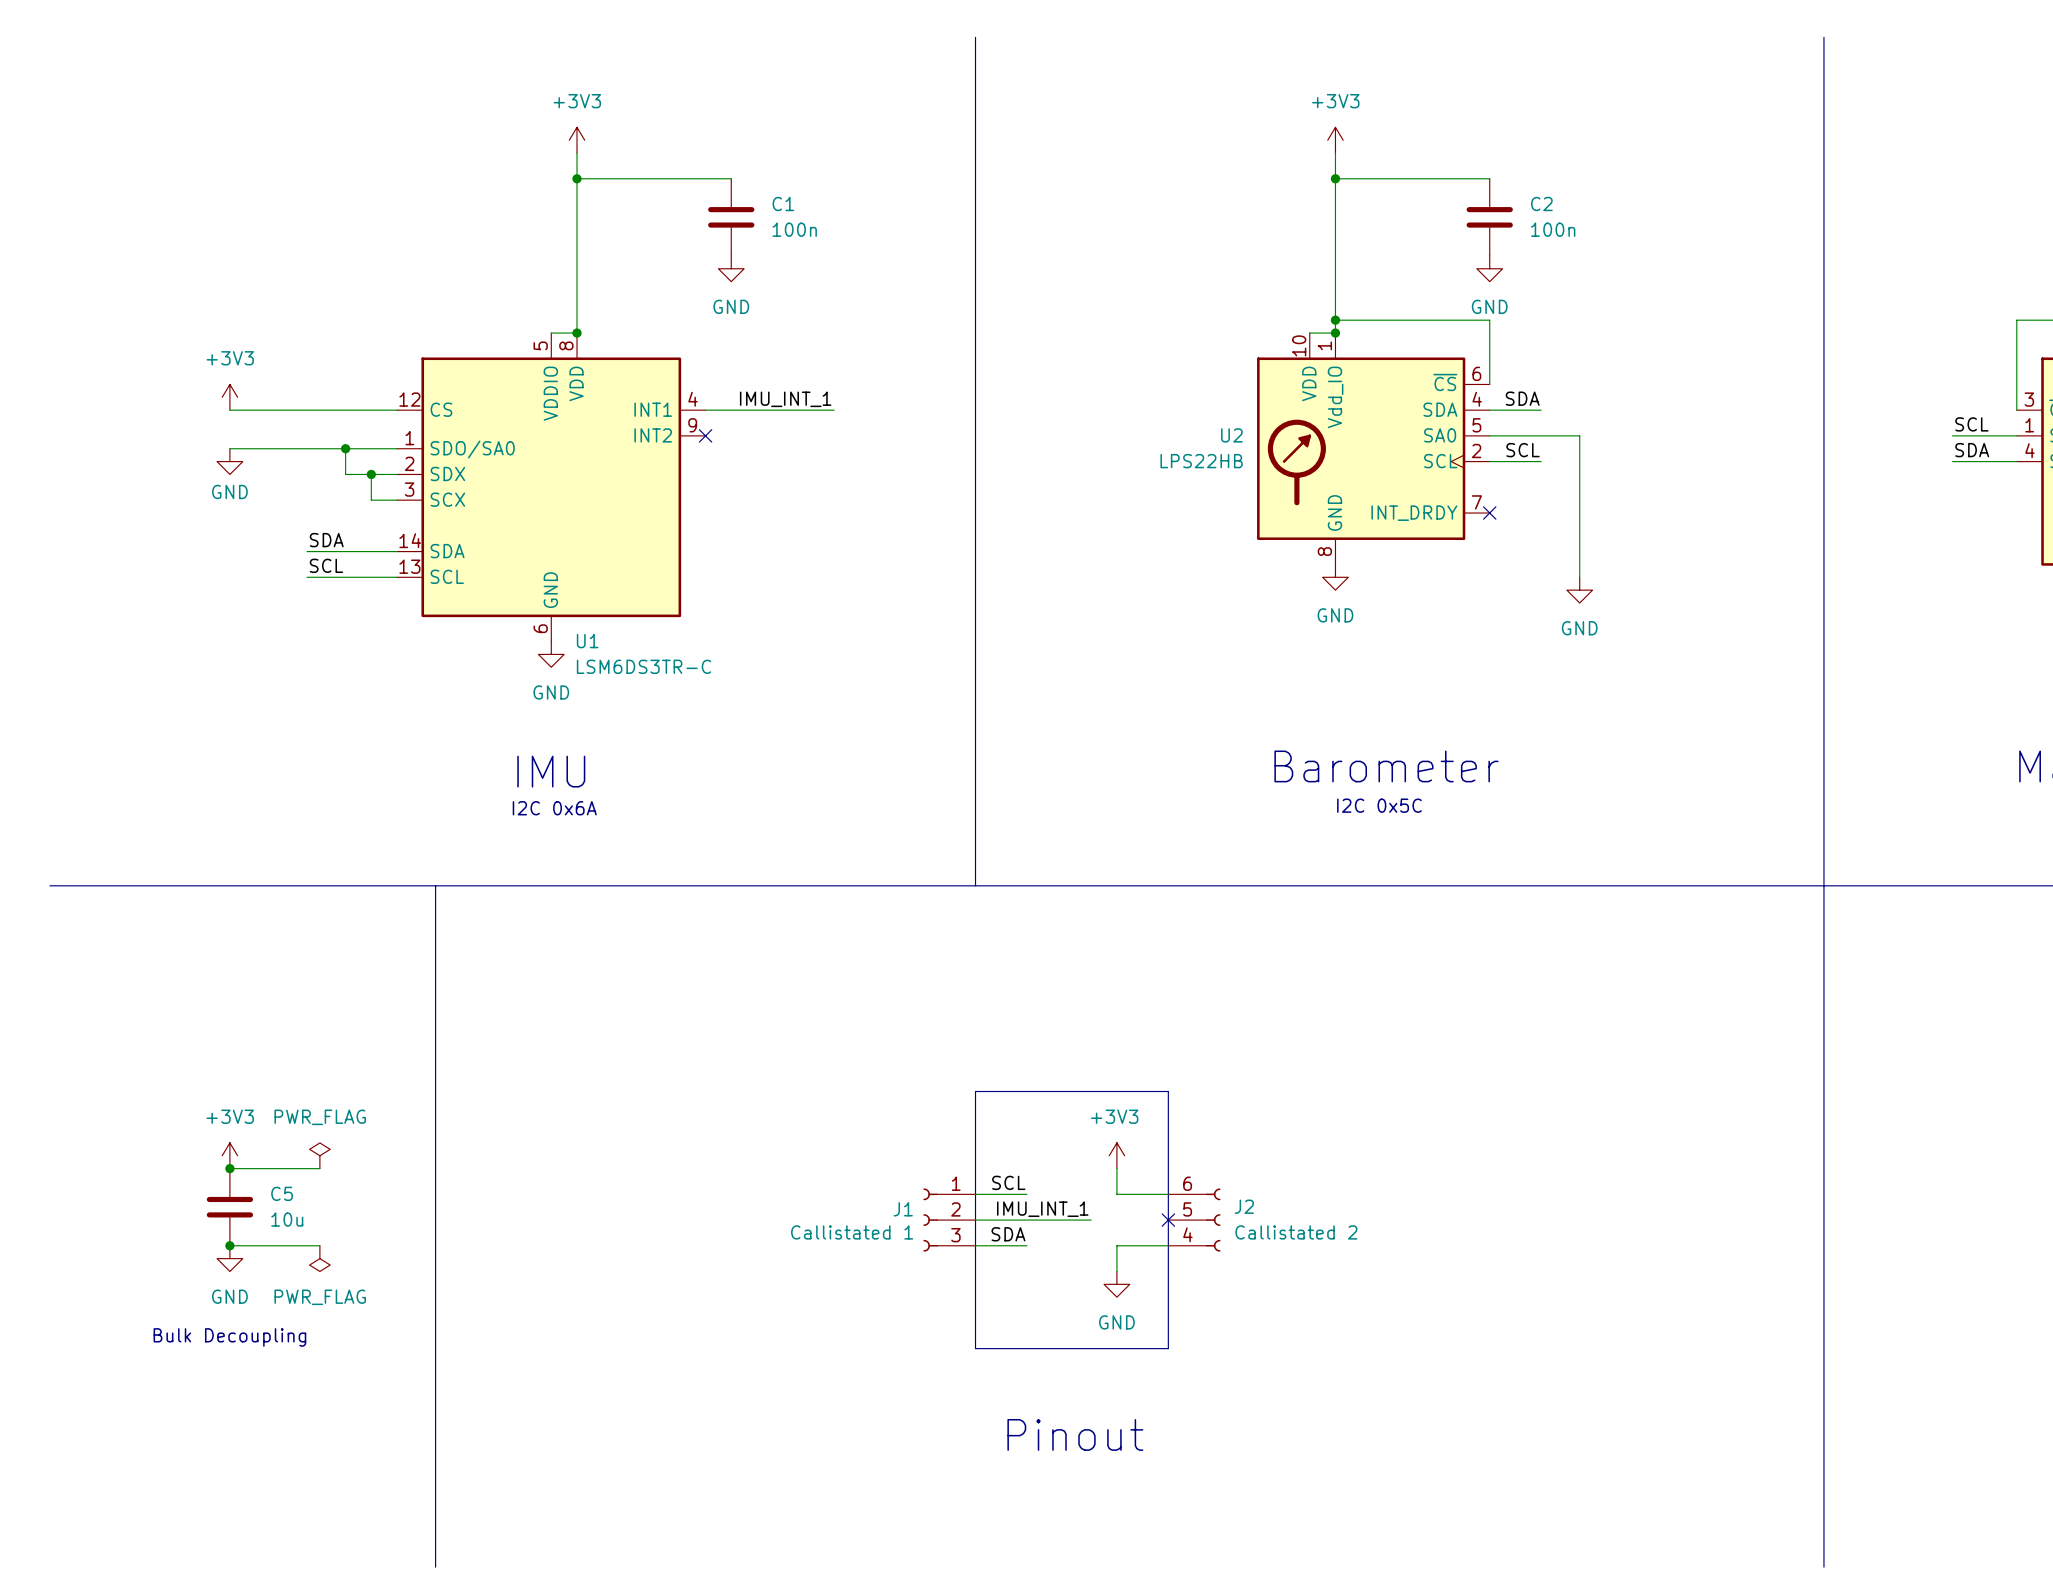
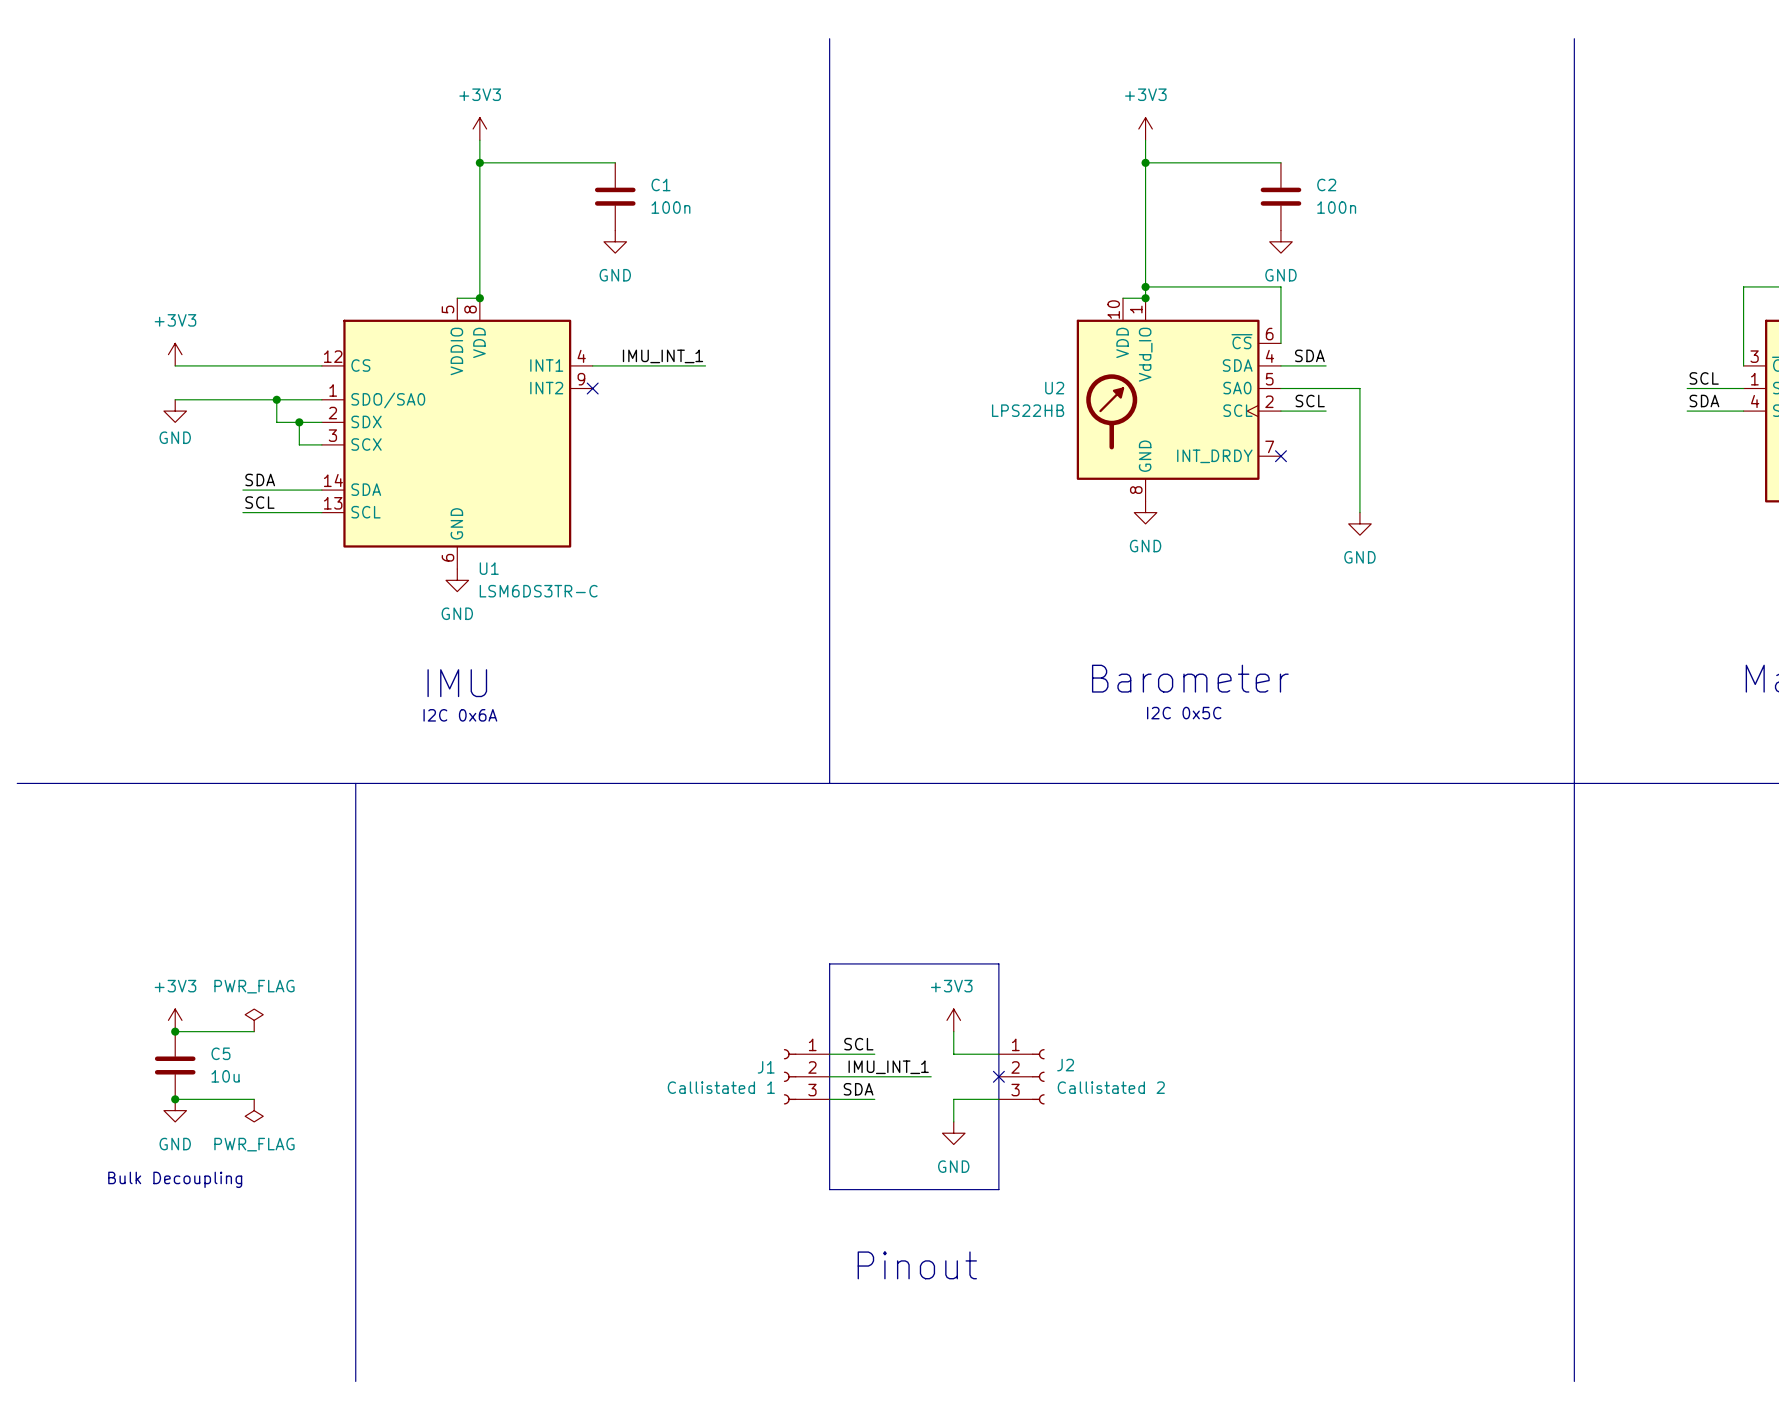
J2 pin number: 6 (1187, 1183) -> 1 (1015, 1044)
J2 pin number: 5 (1187, 1209) -> 2 (1015, 1067)
J2 pin number: 4 (1187, 1234) -> 3 (1015, 1090)

